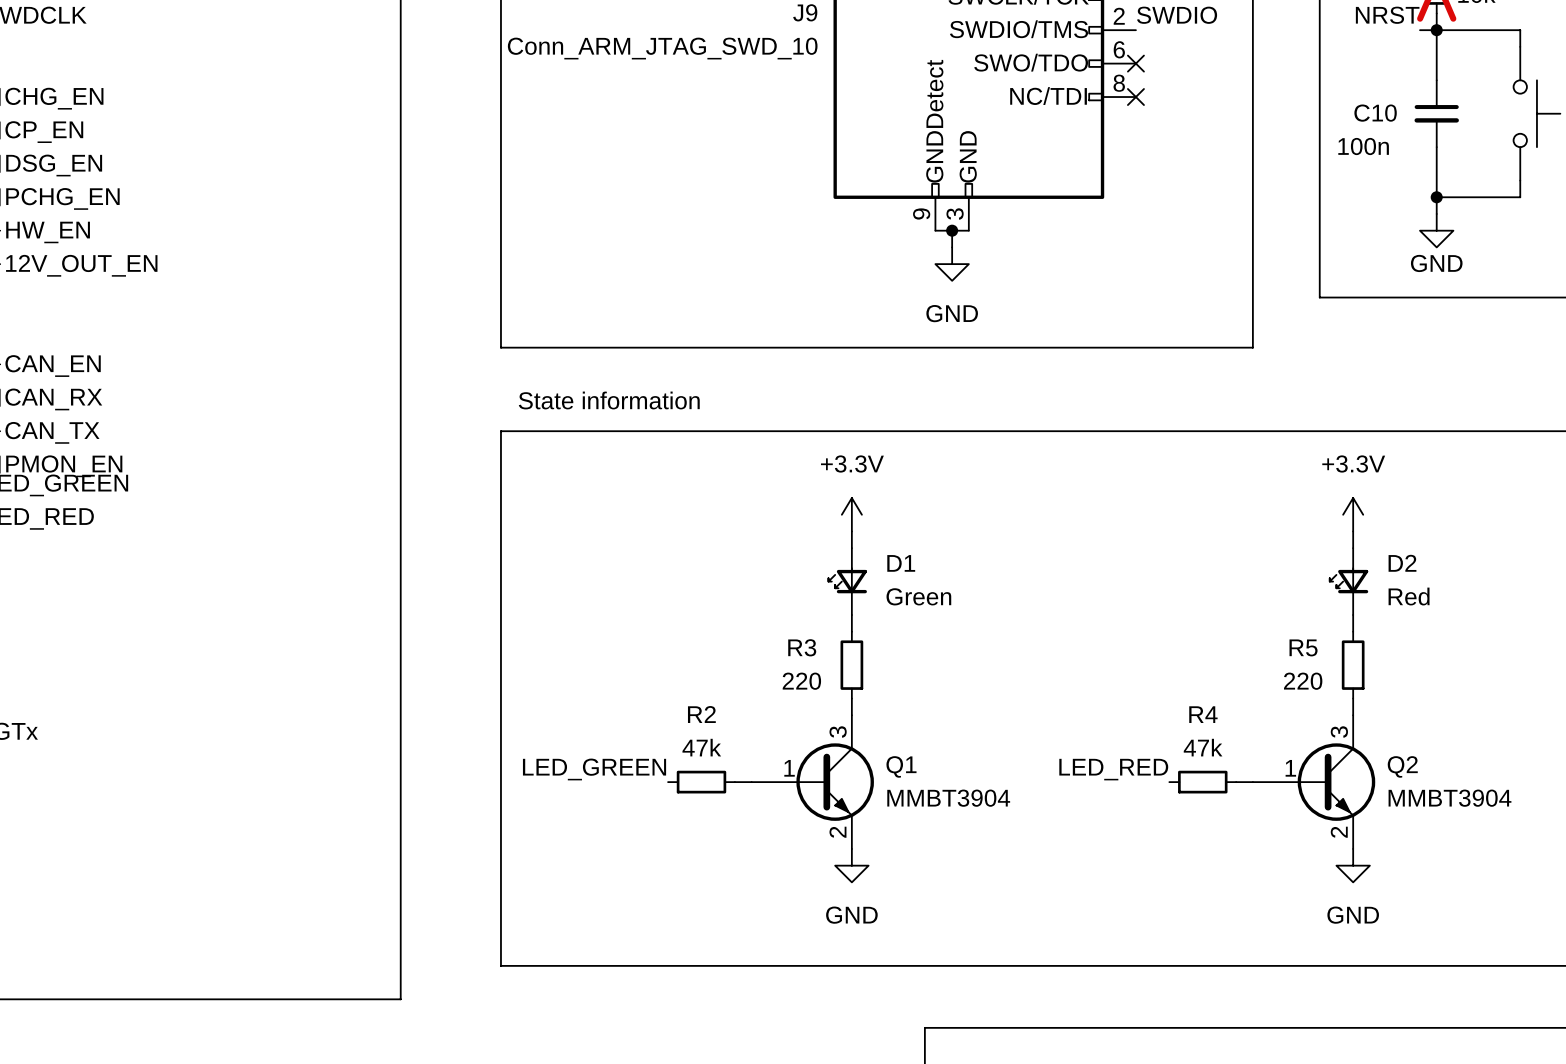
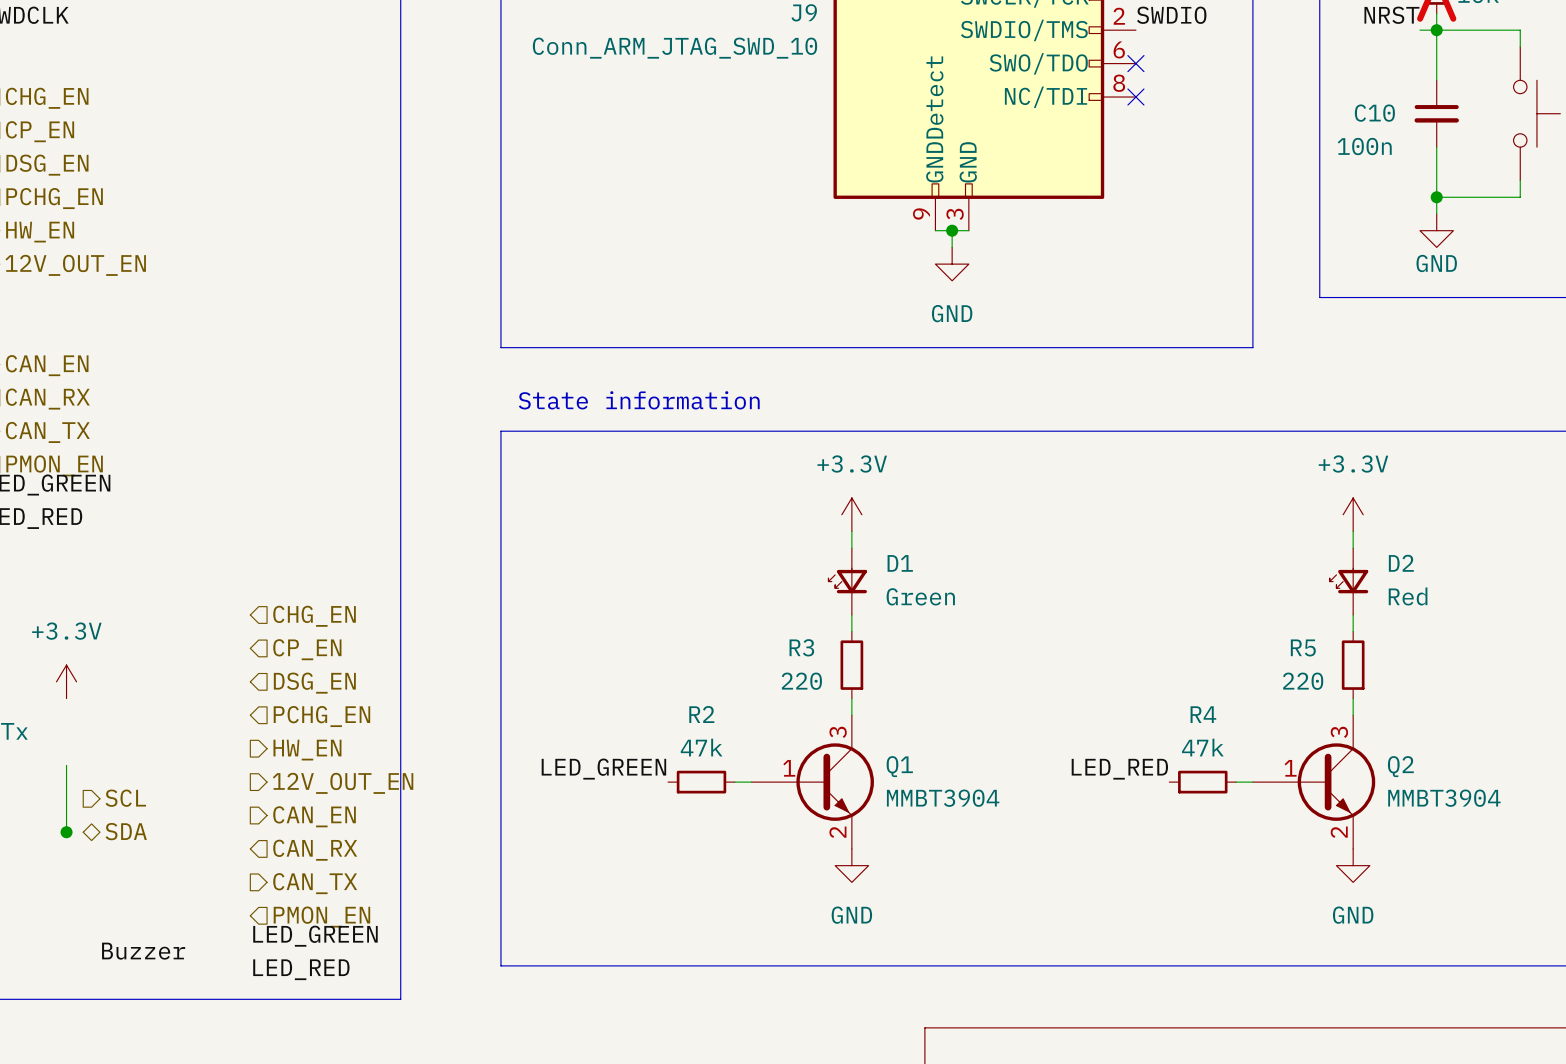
hierarchical label: none -> CHG_EN (314, 616)
hierarchical label: none -> CP_EN (307, 649)
power symbol: none -> +3.3V (66, 681)
hierarchical label: none -> DSG_EN (314, 683)
hierarchical label: none -> PCHG_EN (321, 716)
hierarchical label: none -> HW_EN (307, 750)
wire: none -> (66, 765) (66, 832)
hierarchical label: none -> 12V_OUT_EN (343, 783)
hierarchical label: none -> SCL (125, 798)
hierarchical label: none -> CAN_EN (314, 816)
hierarchical label: none -> SDA (126, 831)
junction: none -> (66, 832)
hierarchical label: none -> CAN_RX (315, 850)
hierarchical label: none -> CAN_TX (315, 883)
hierarchical label: none -> PMON_EN (321, 917)
label: none -> LED_GREEN (315, 936)
label: none -> Buzzer (143, 951)
label: none -> LED_RED (301, 969)

